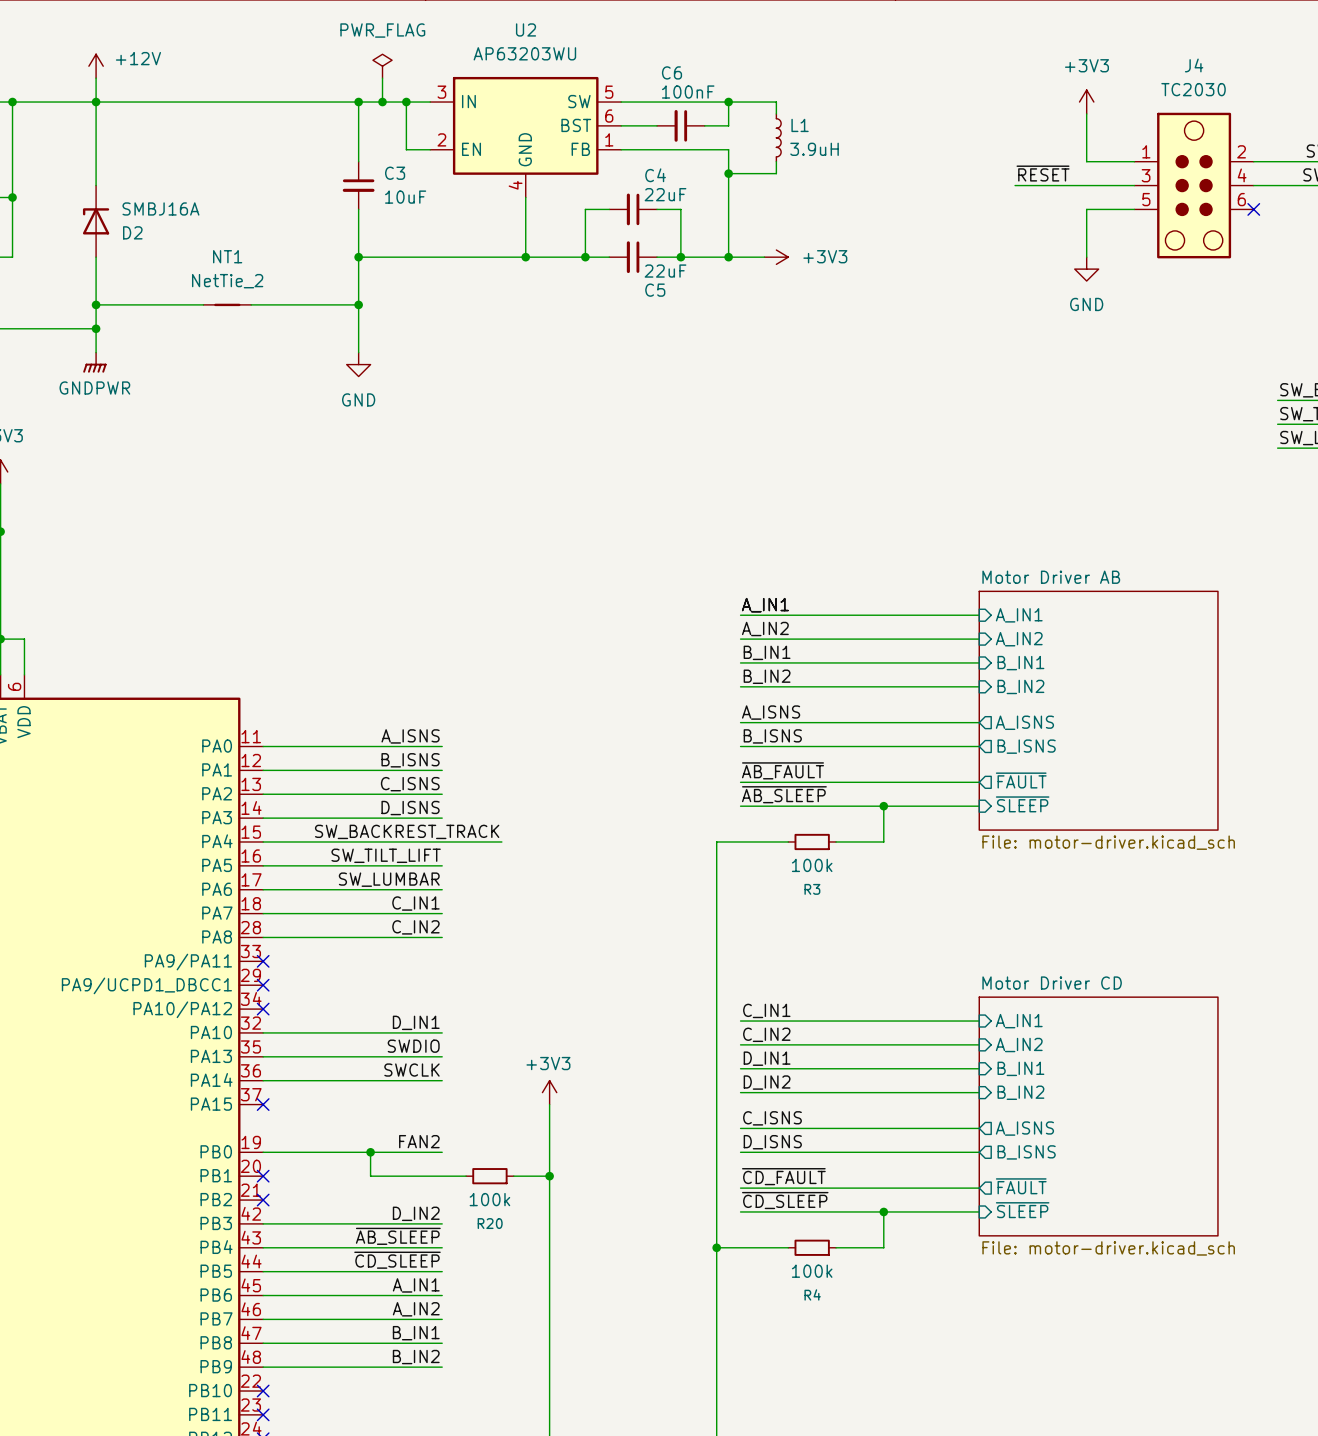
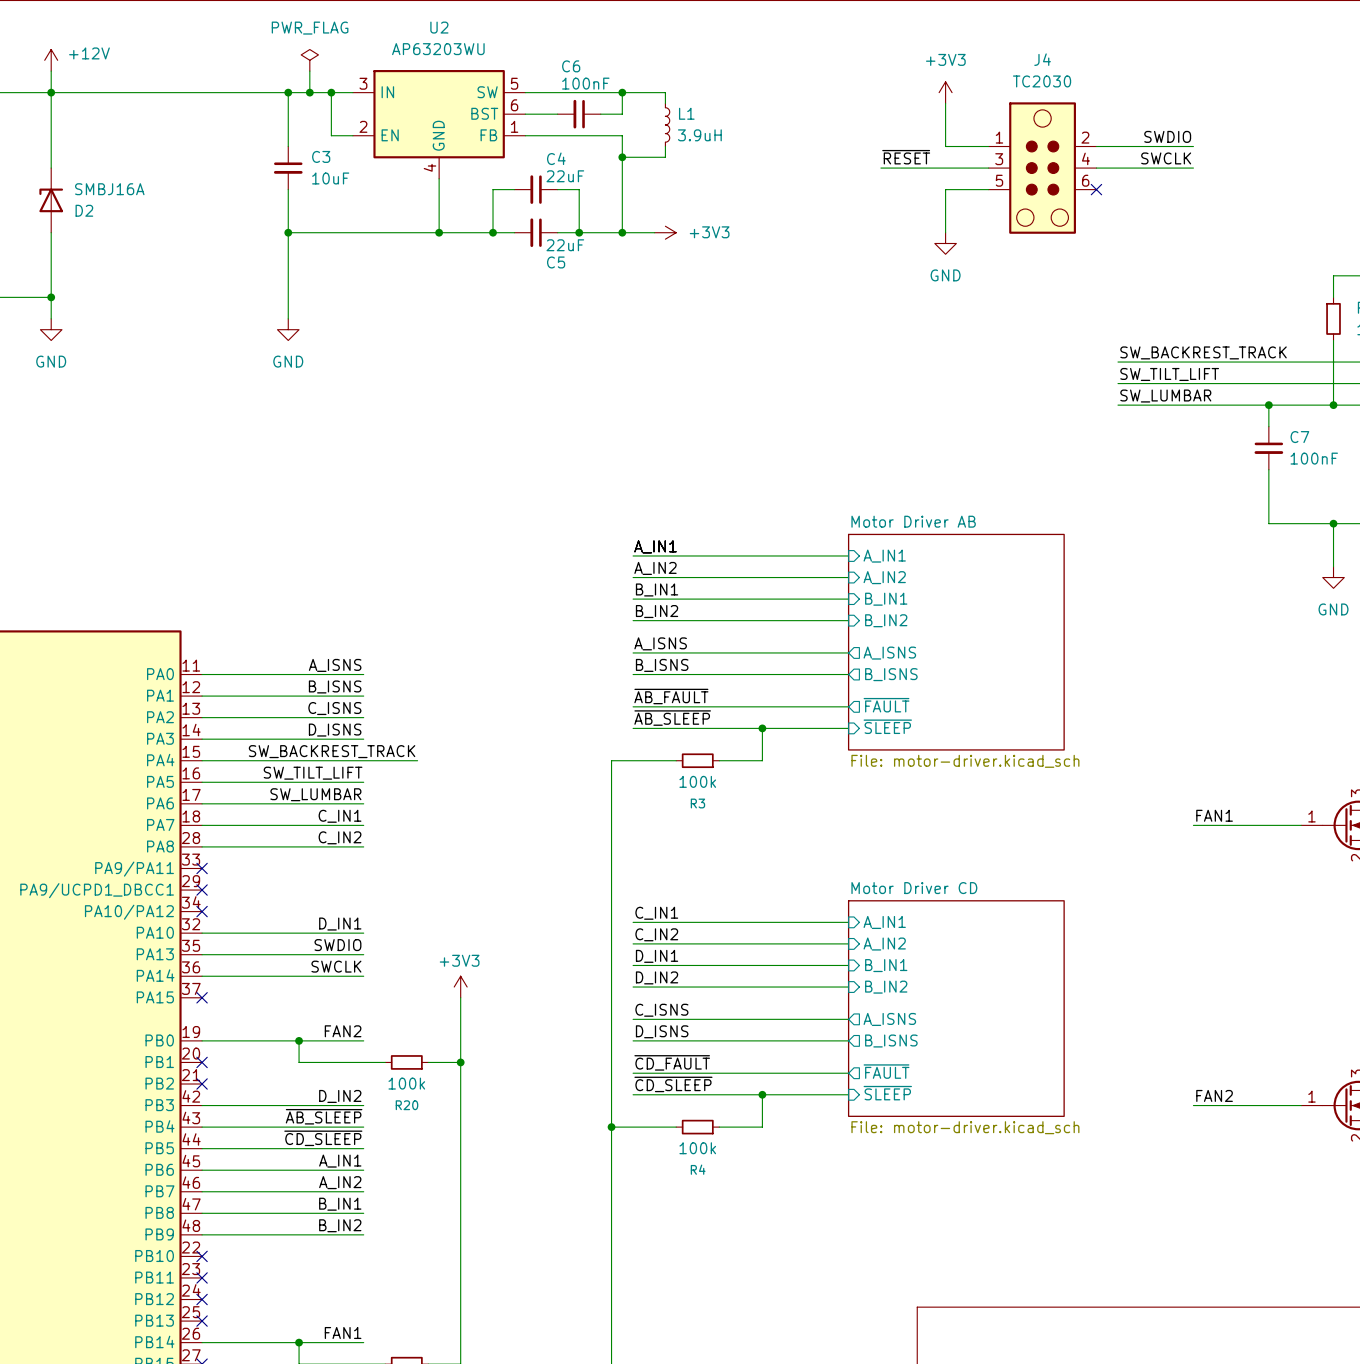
wire: (96, 304) (203, 304) -> none
junction: (96, 304) -> none
NT1: NetTie_2 (227, 304) -> none
wire: (251, 304) (358, 304) -> none
junction: (358, 304) -> none
power symbol: GNDPWR (94, 362) -> GND (51, 329)

